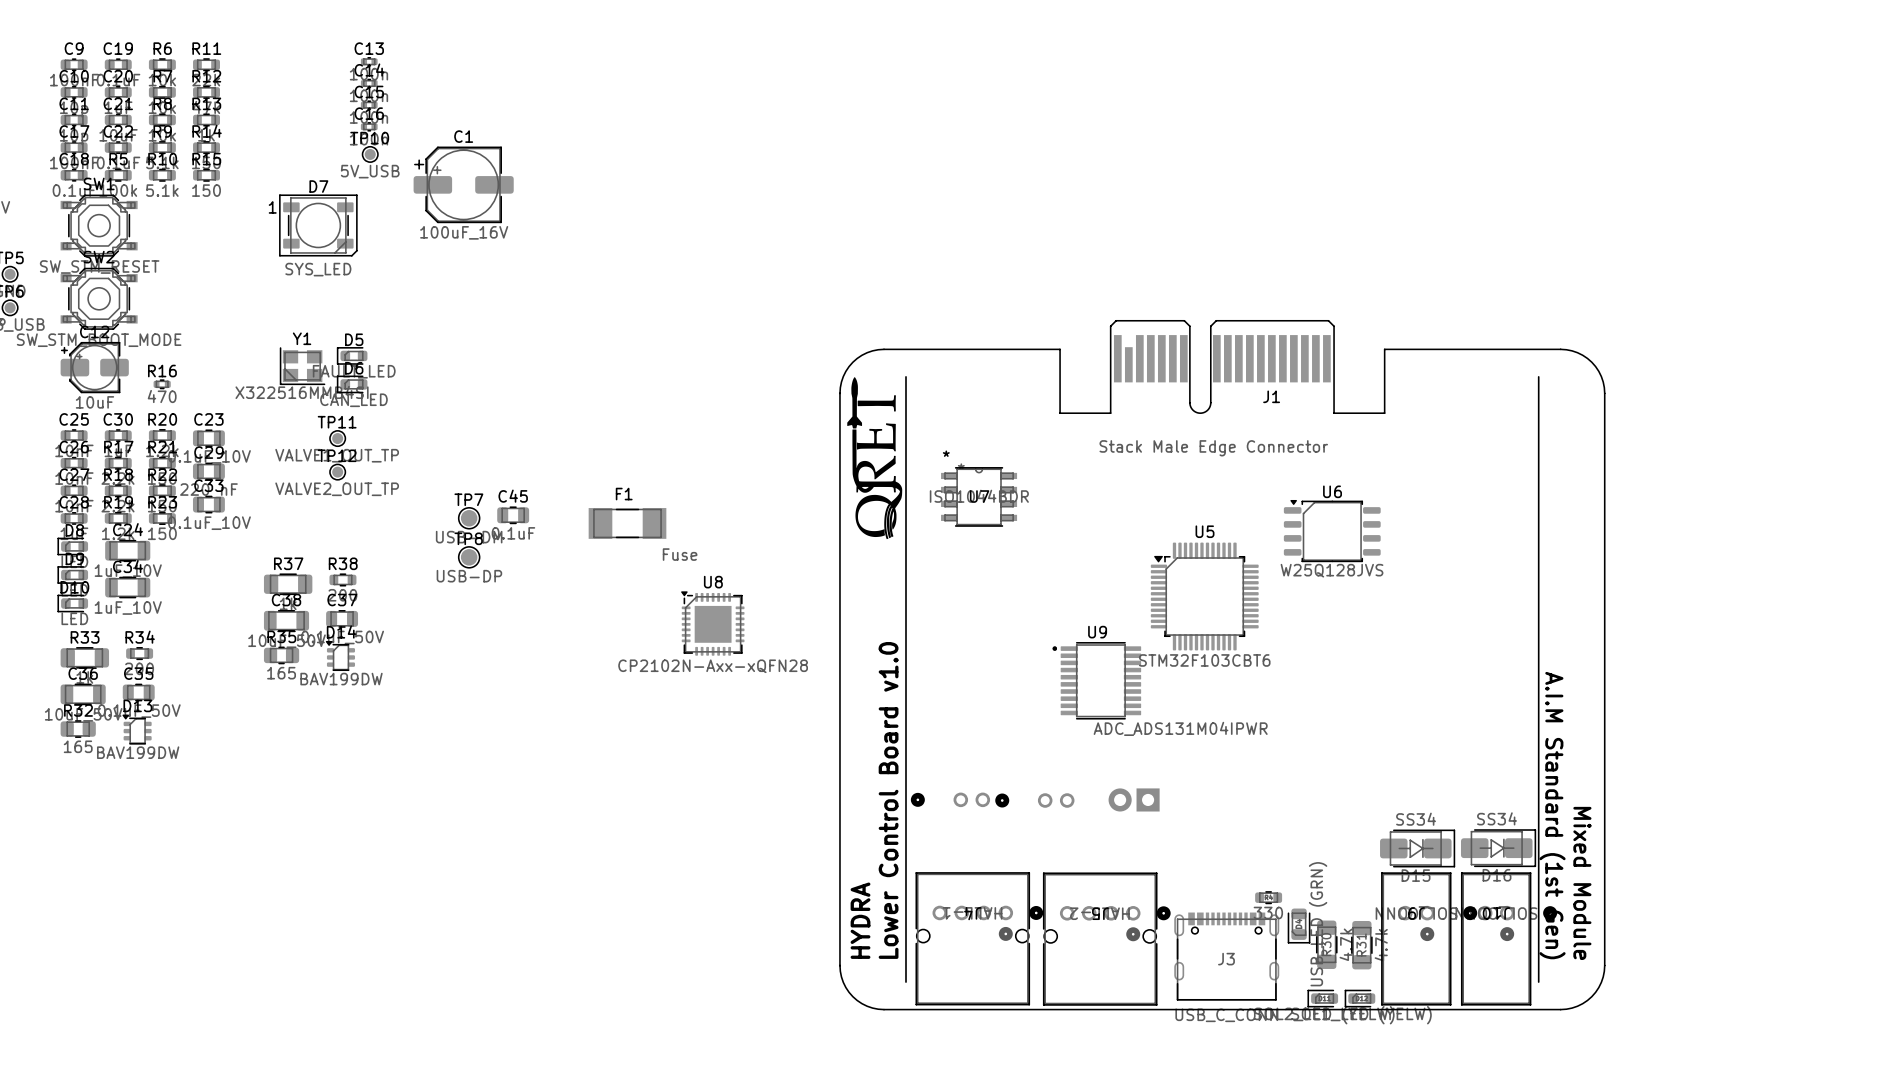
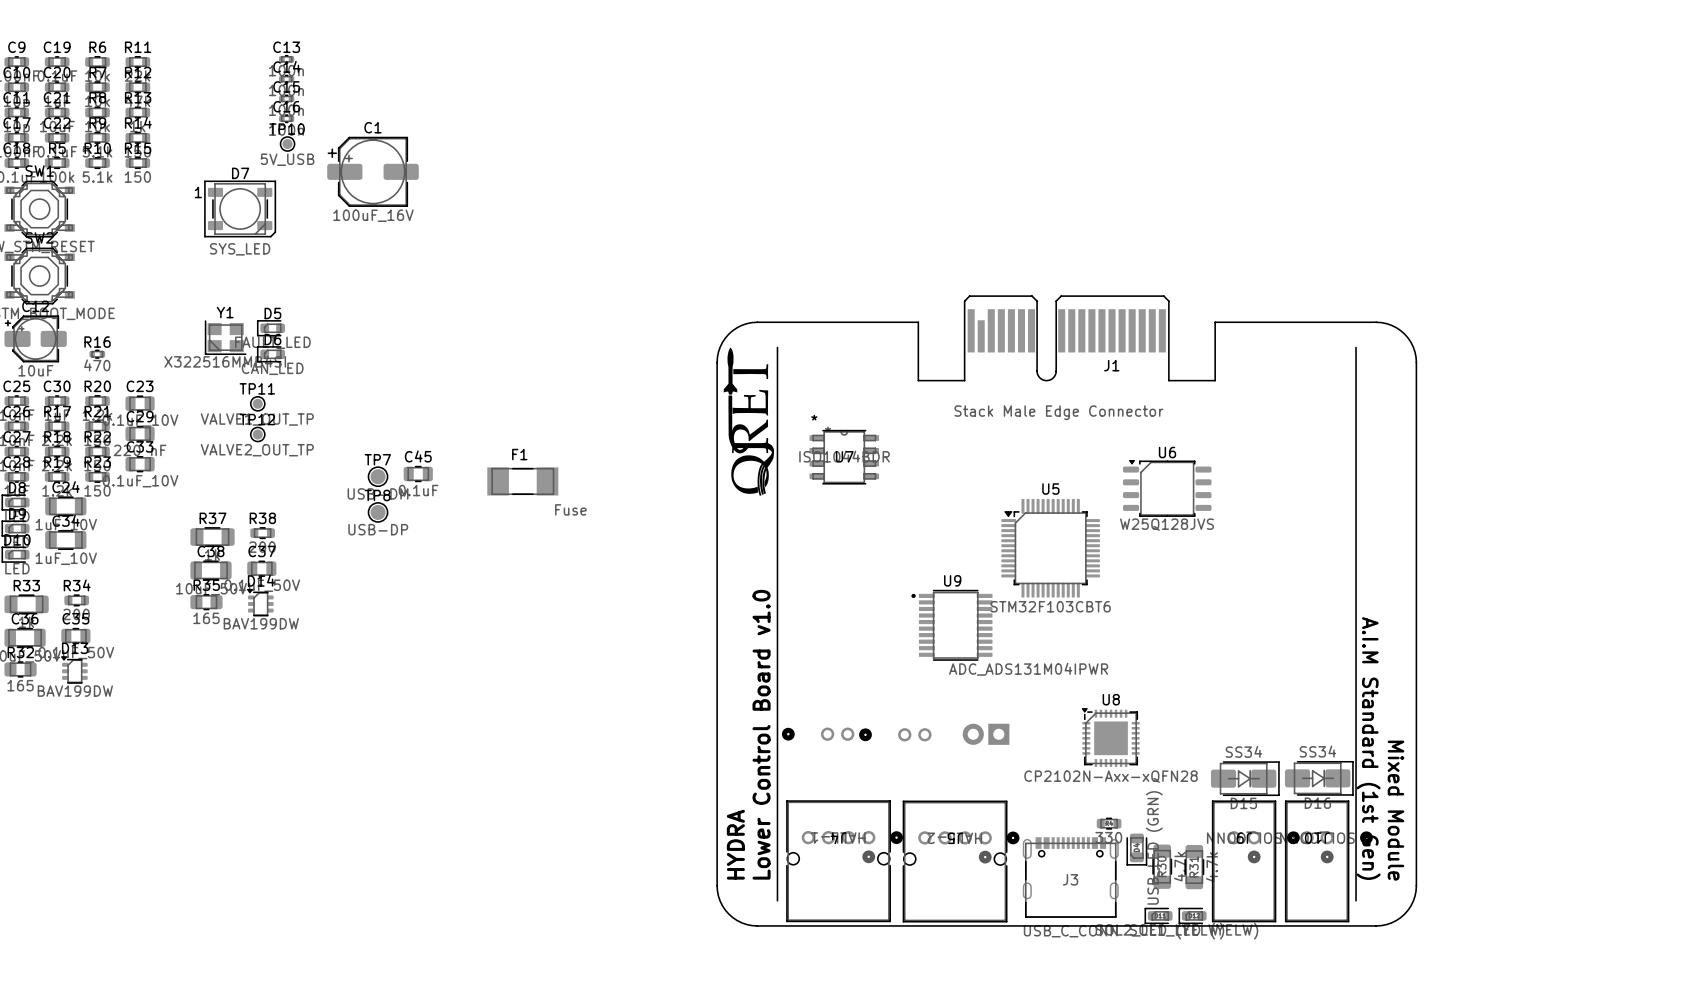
U8 position: (712, 623) -> (1110, 737)

